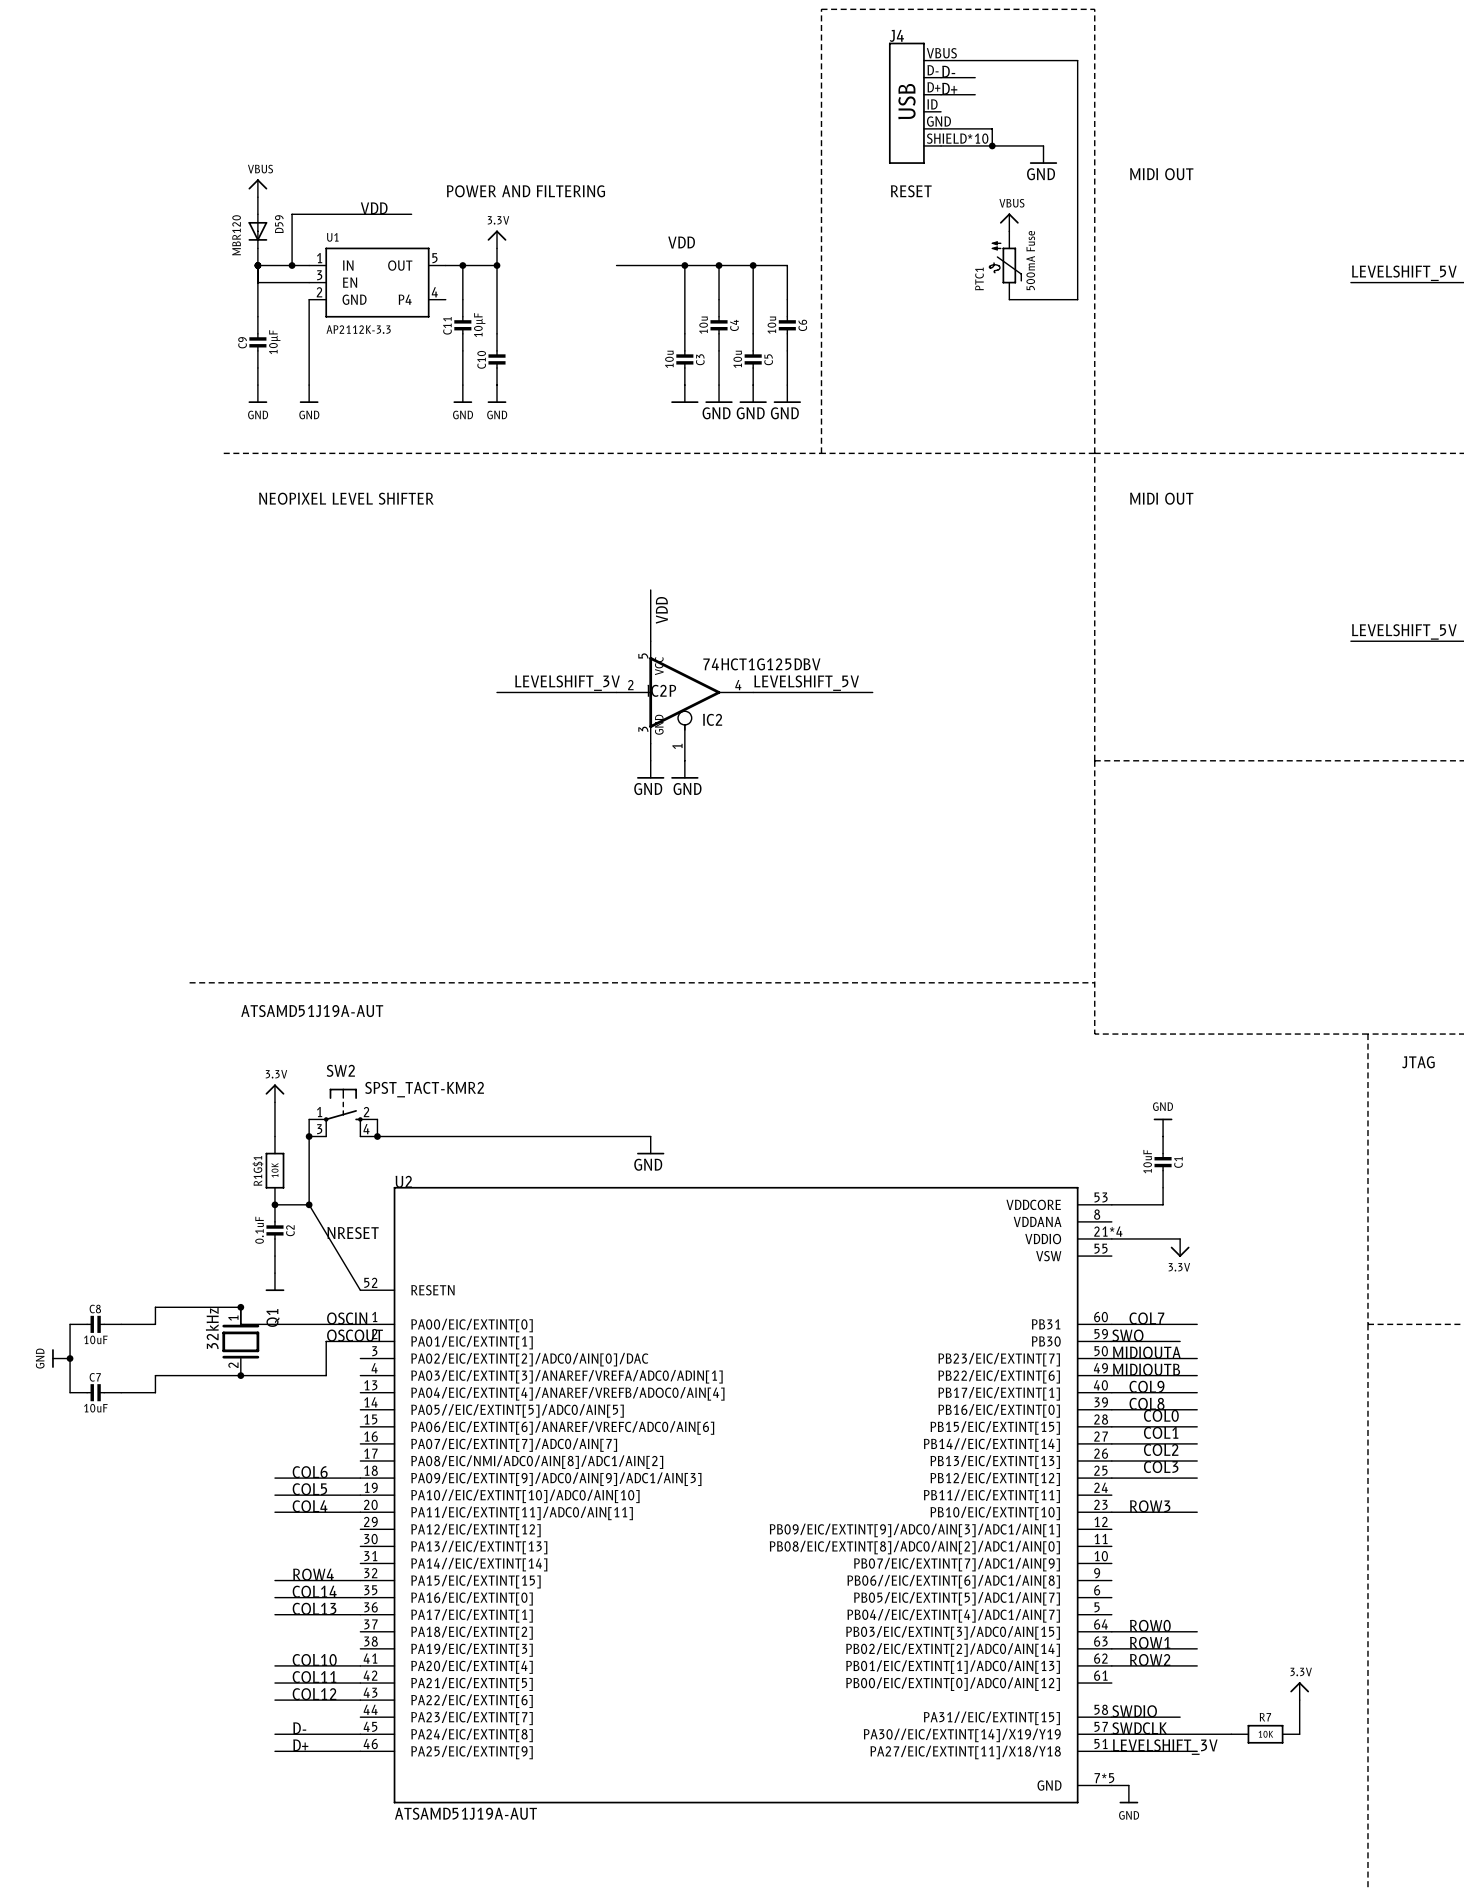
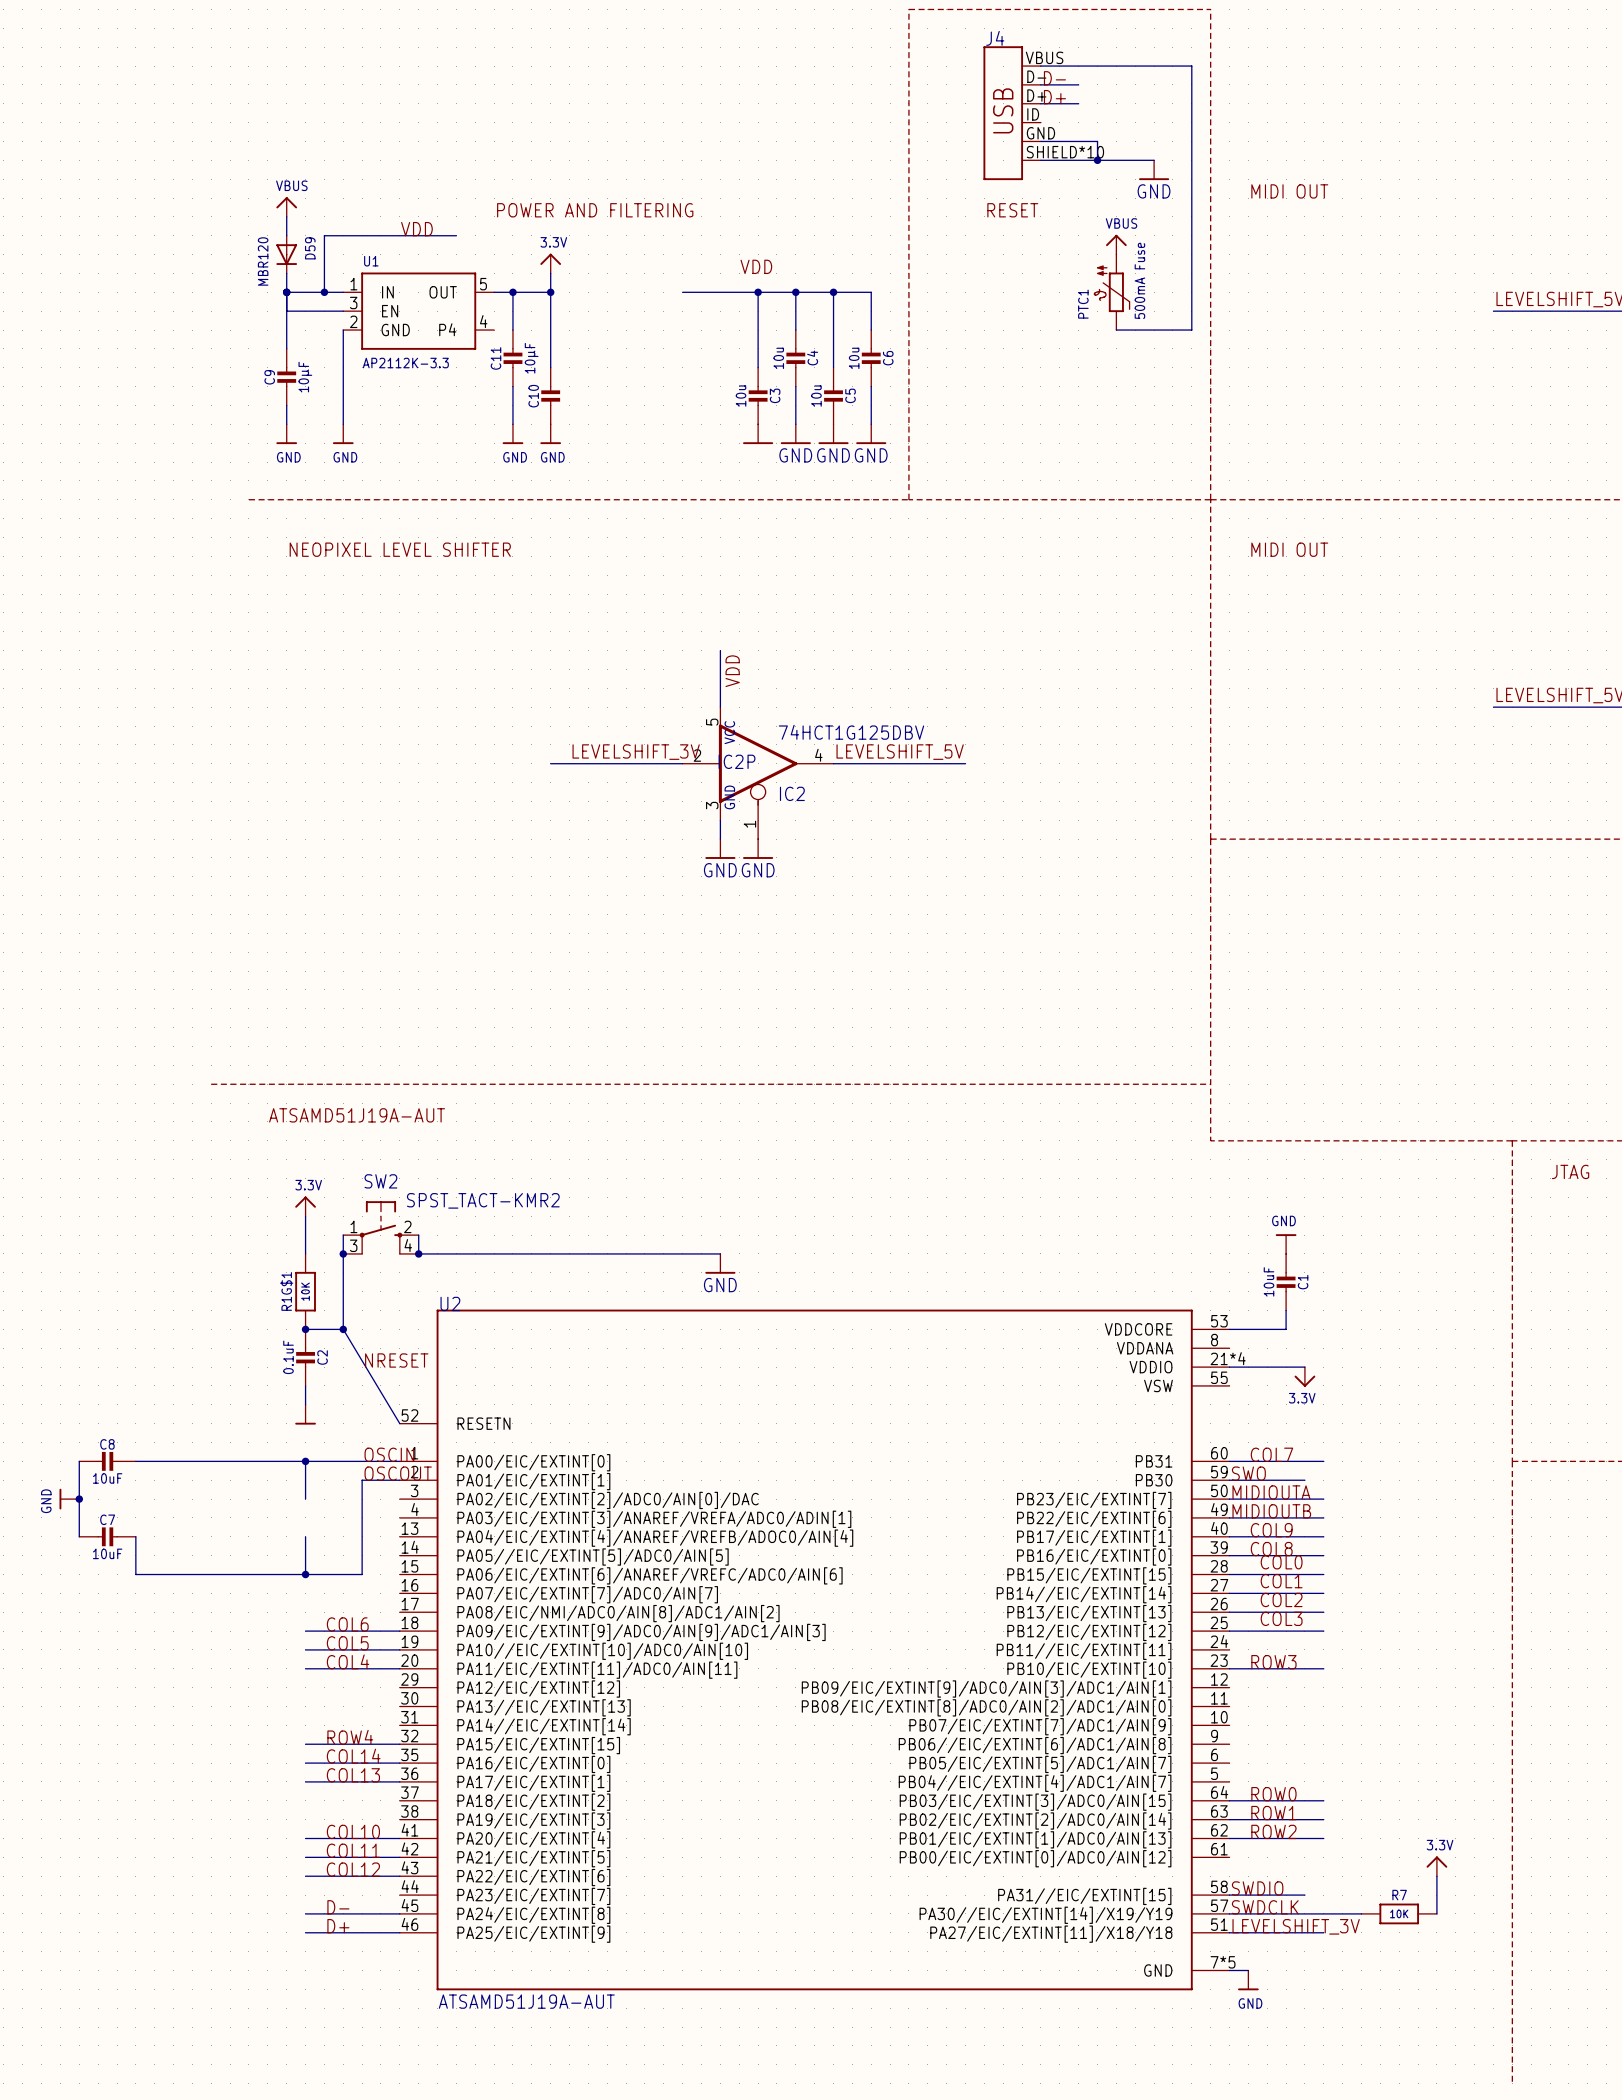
junction: (240, 1307) -> none
wire: (155, 1324) (155, 1307) (240, 1307) (240, 1324) -> (173, 1461) (267, 1461)
wire: none -> (305, 1461) (305, 1499)
junction: none -> (305, 1461)
Q1: 32kHz (240, 1341) -> none
junction: (240, 1375) -> none
wire: (326, 1375) (155, 1375) (155, 1392) (121, 1392) -> (362, 1517) (362, 1574) (135, 1574) (135, 1536)
wire: none -> (305, 1536) (305, 1574)
junction: none -> (305, 1574)

